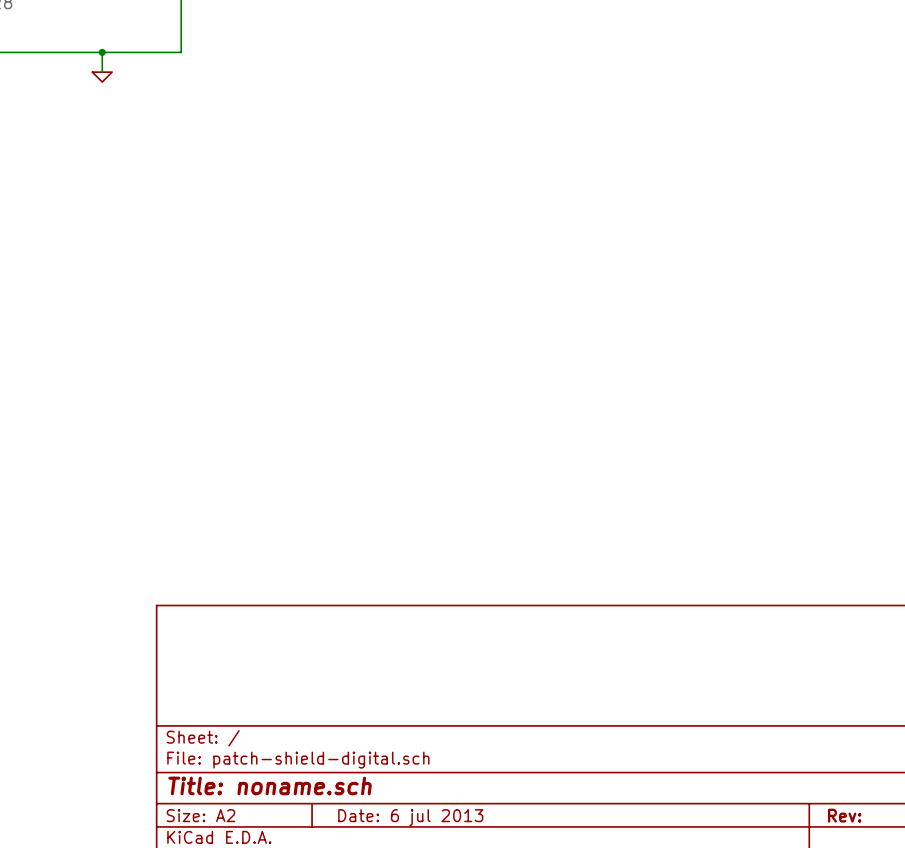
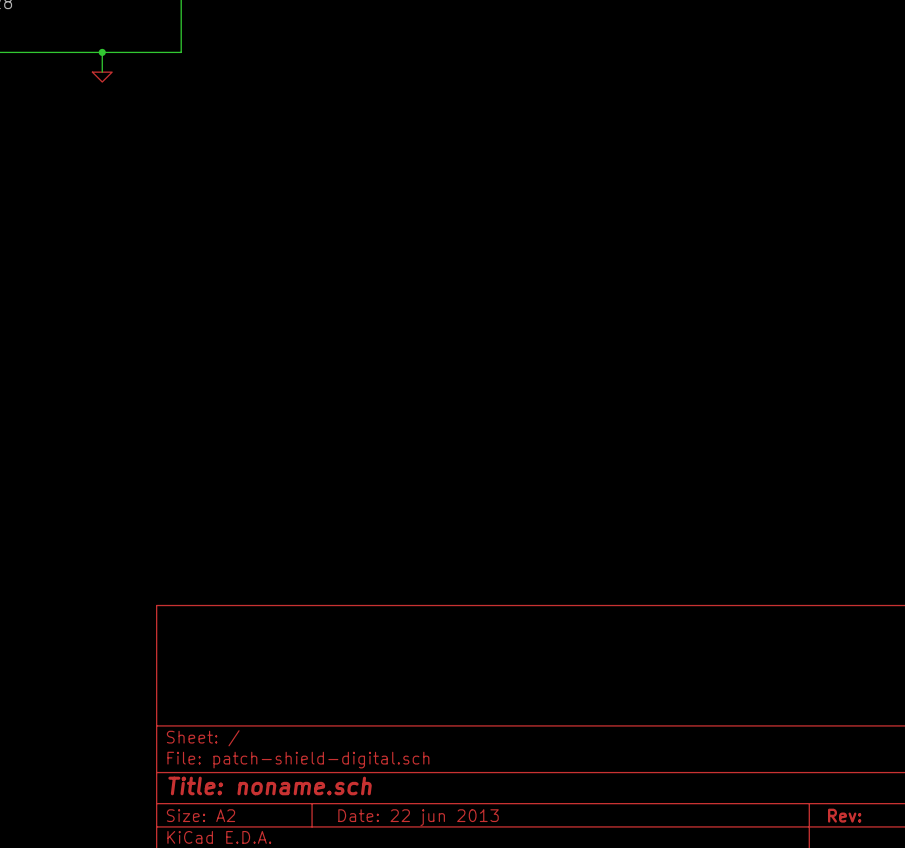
title block: Date: 6 jul 2013 (410, 817) -> Date: 22 jun 2013 (418, 817)

